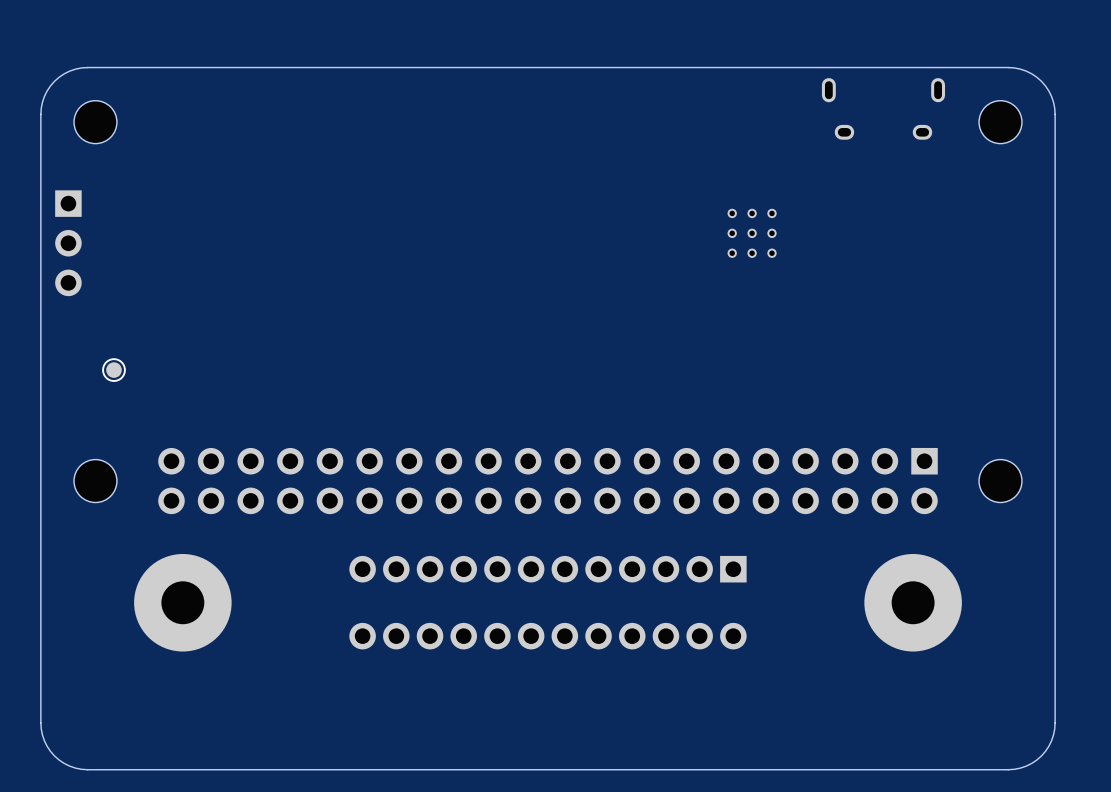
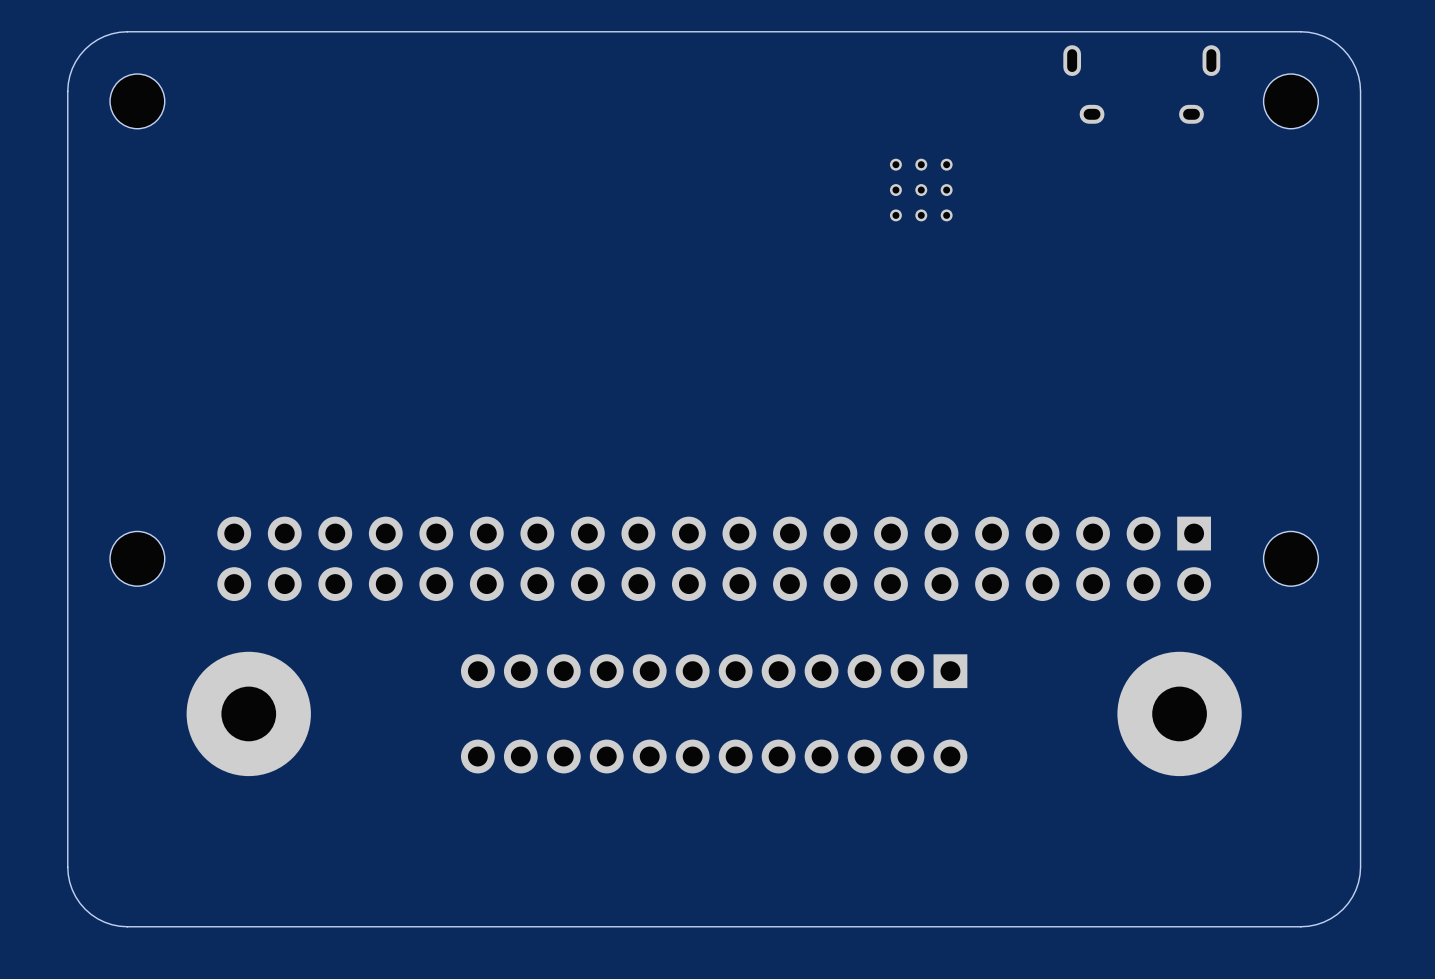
part position: (752, 233) -> (921, 190)
part: (68, 243) -> none
part: (114, 370) -> none

